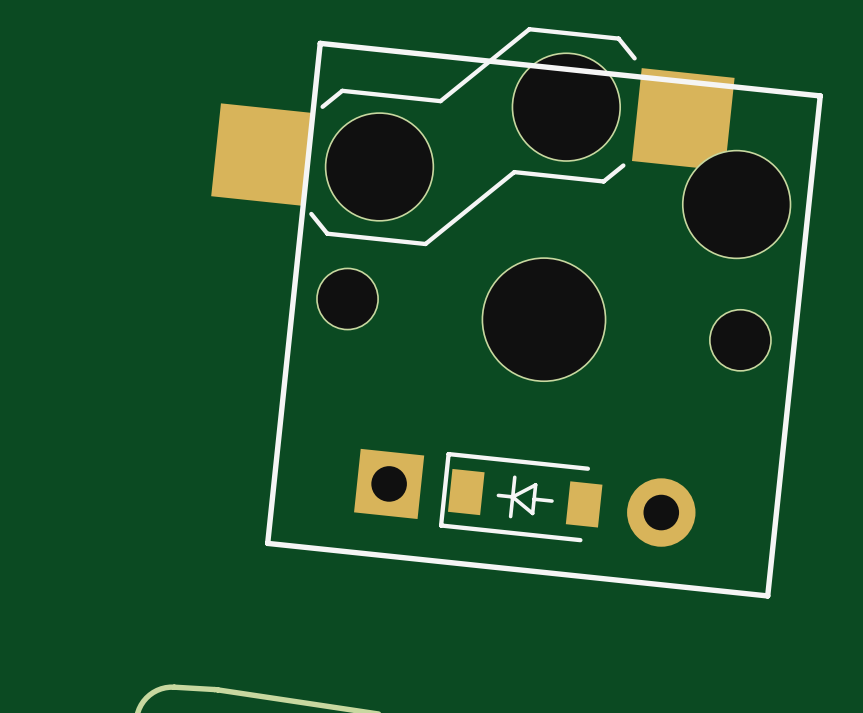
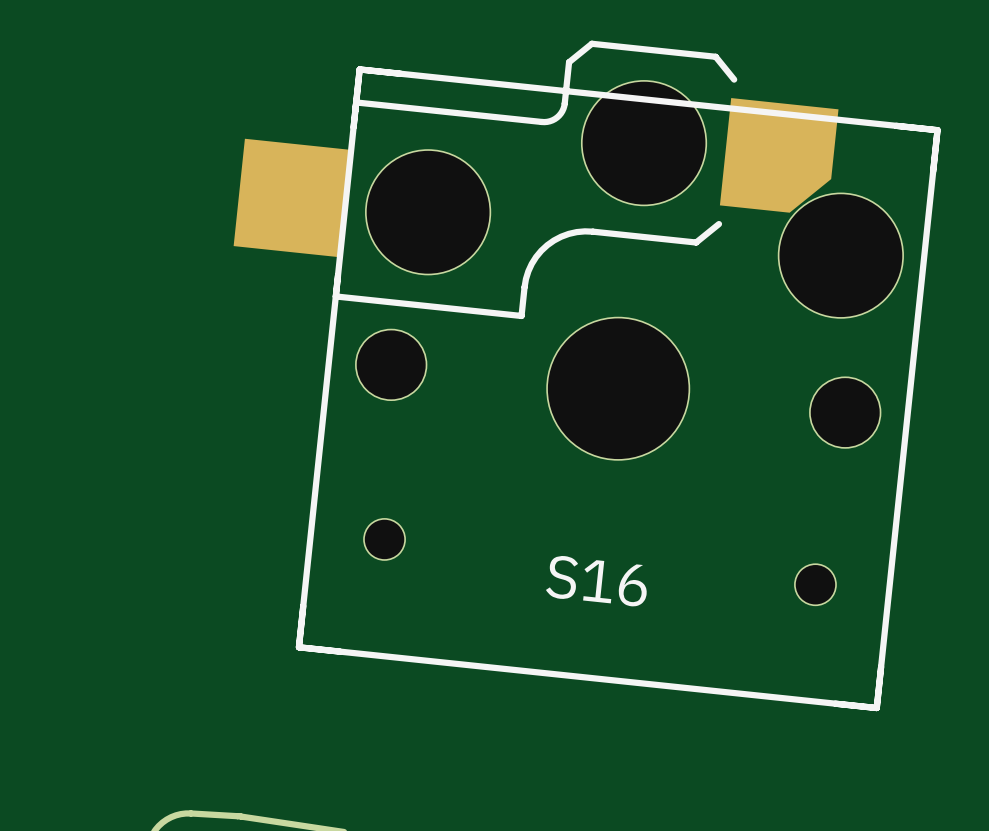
part: (500, 204) -> none
S16: none -> (587, 375)
part: (524, 497) -> none

